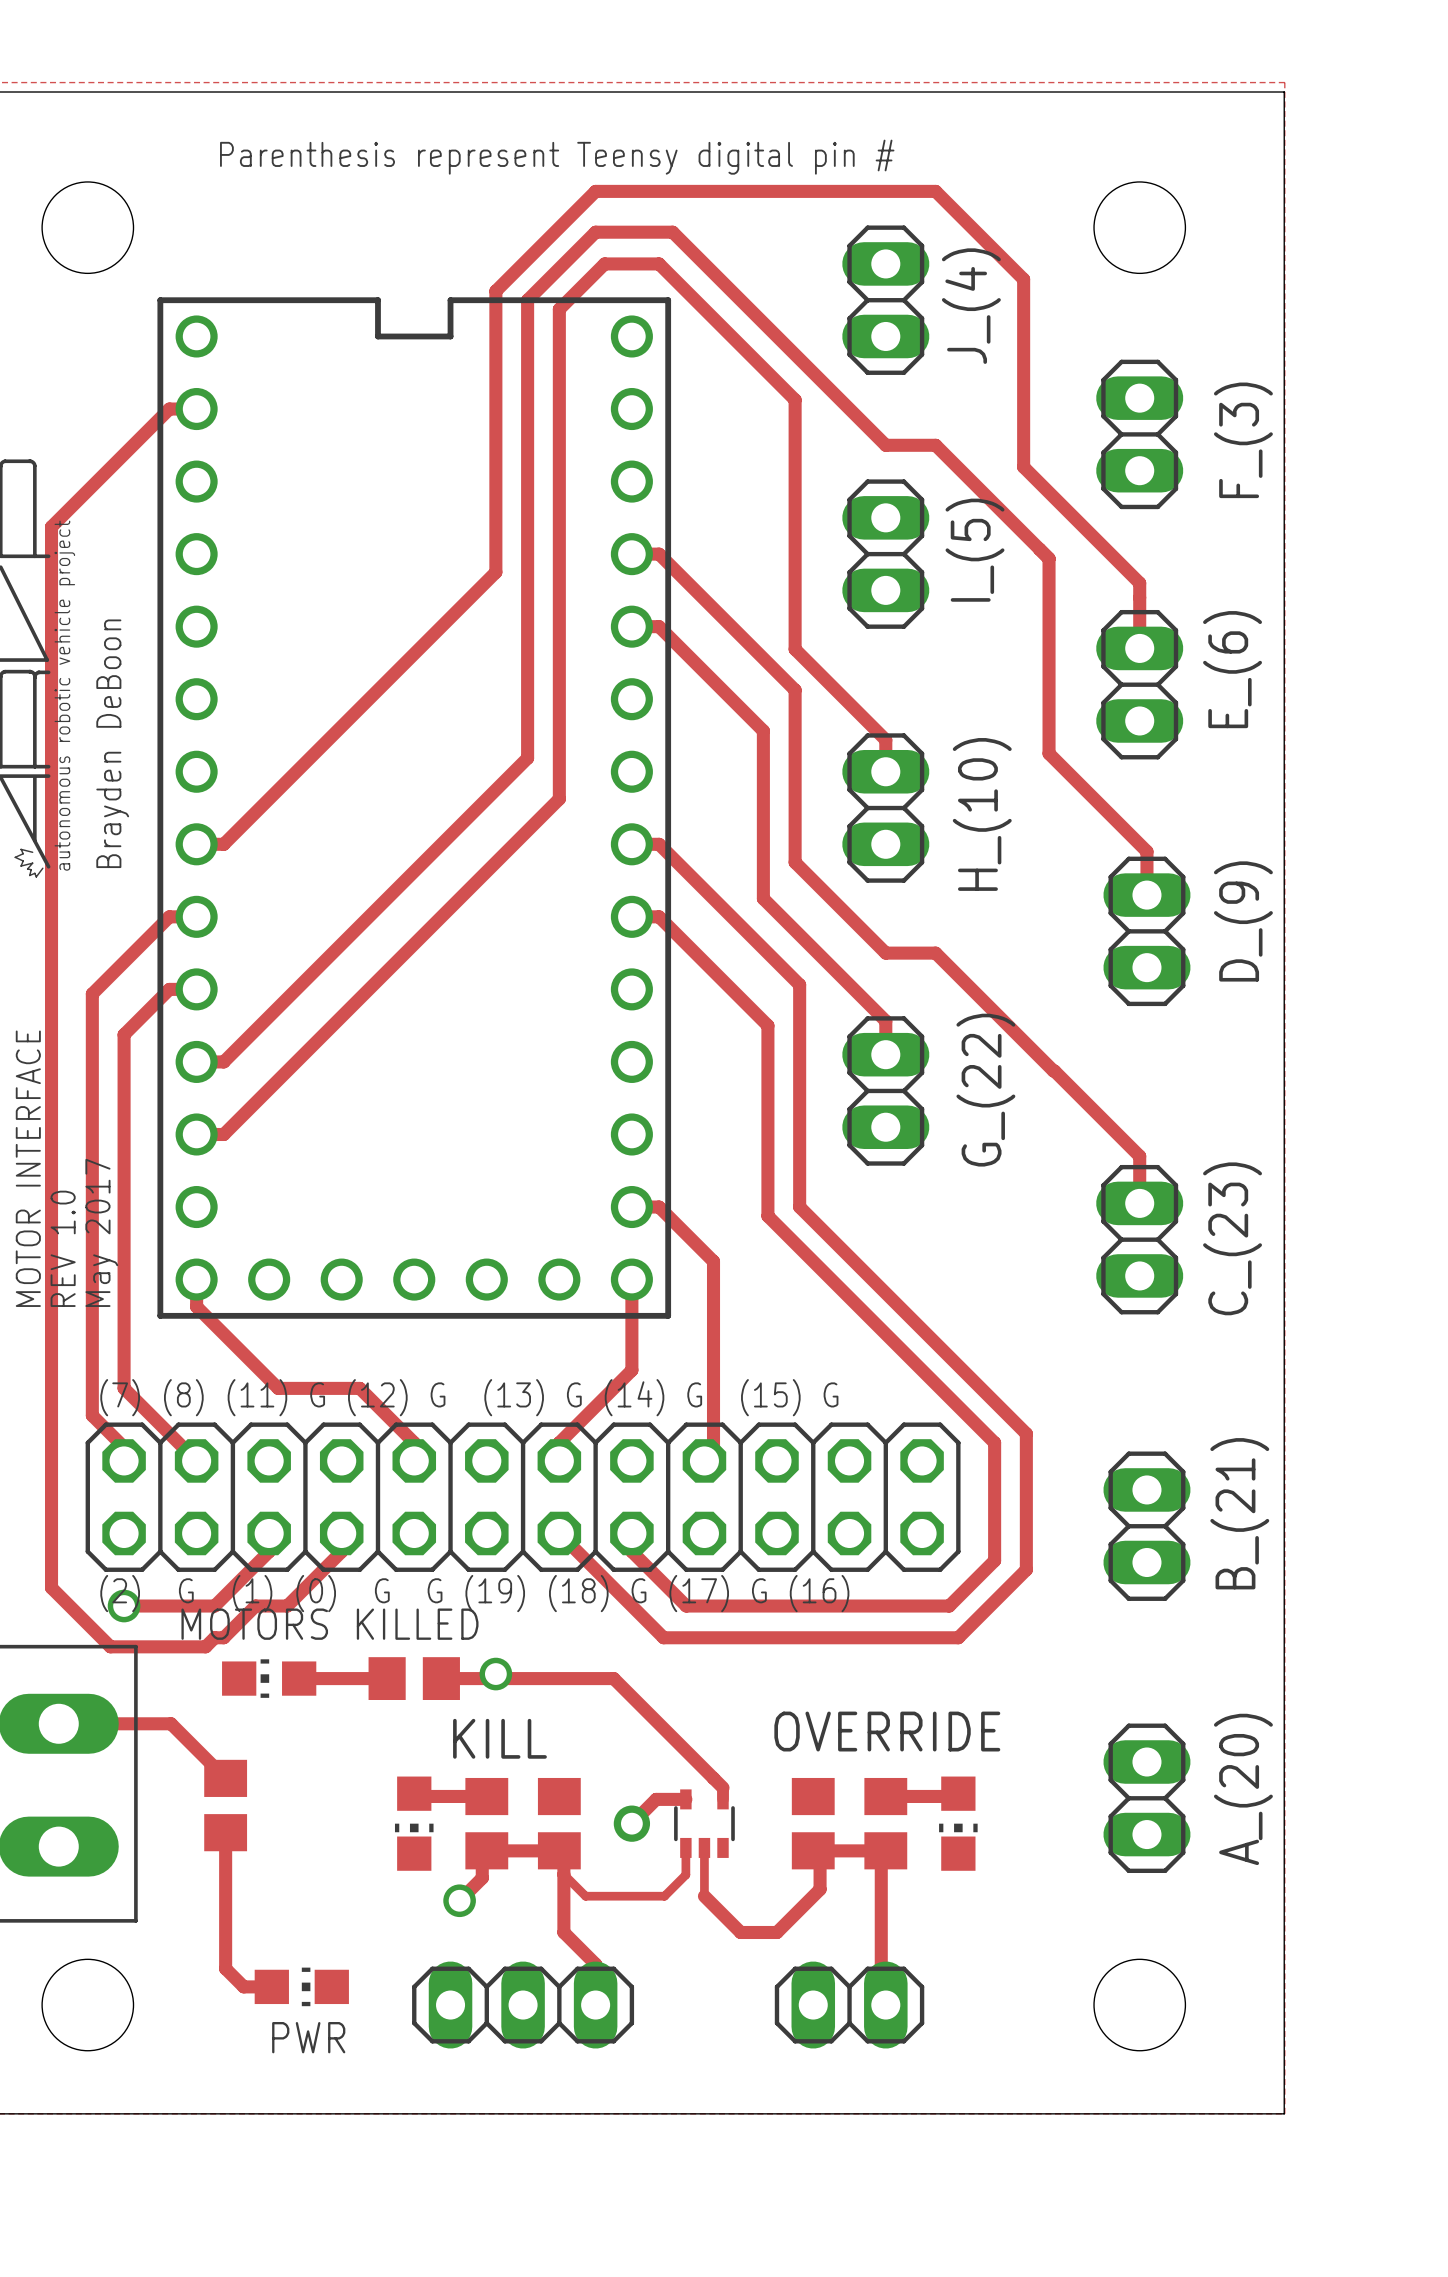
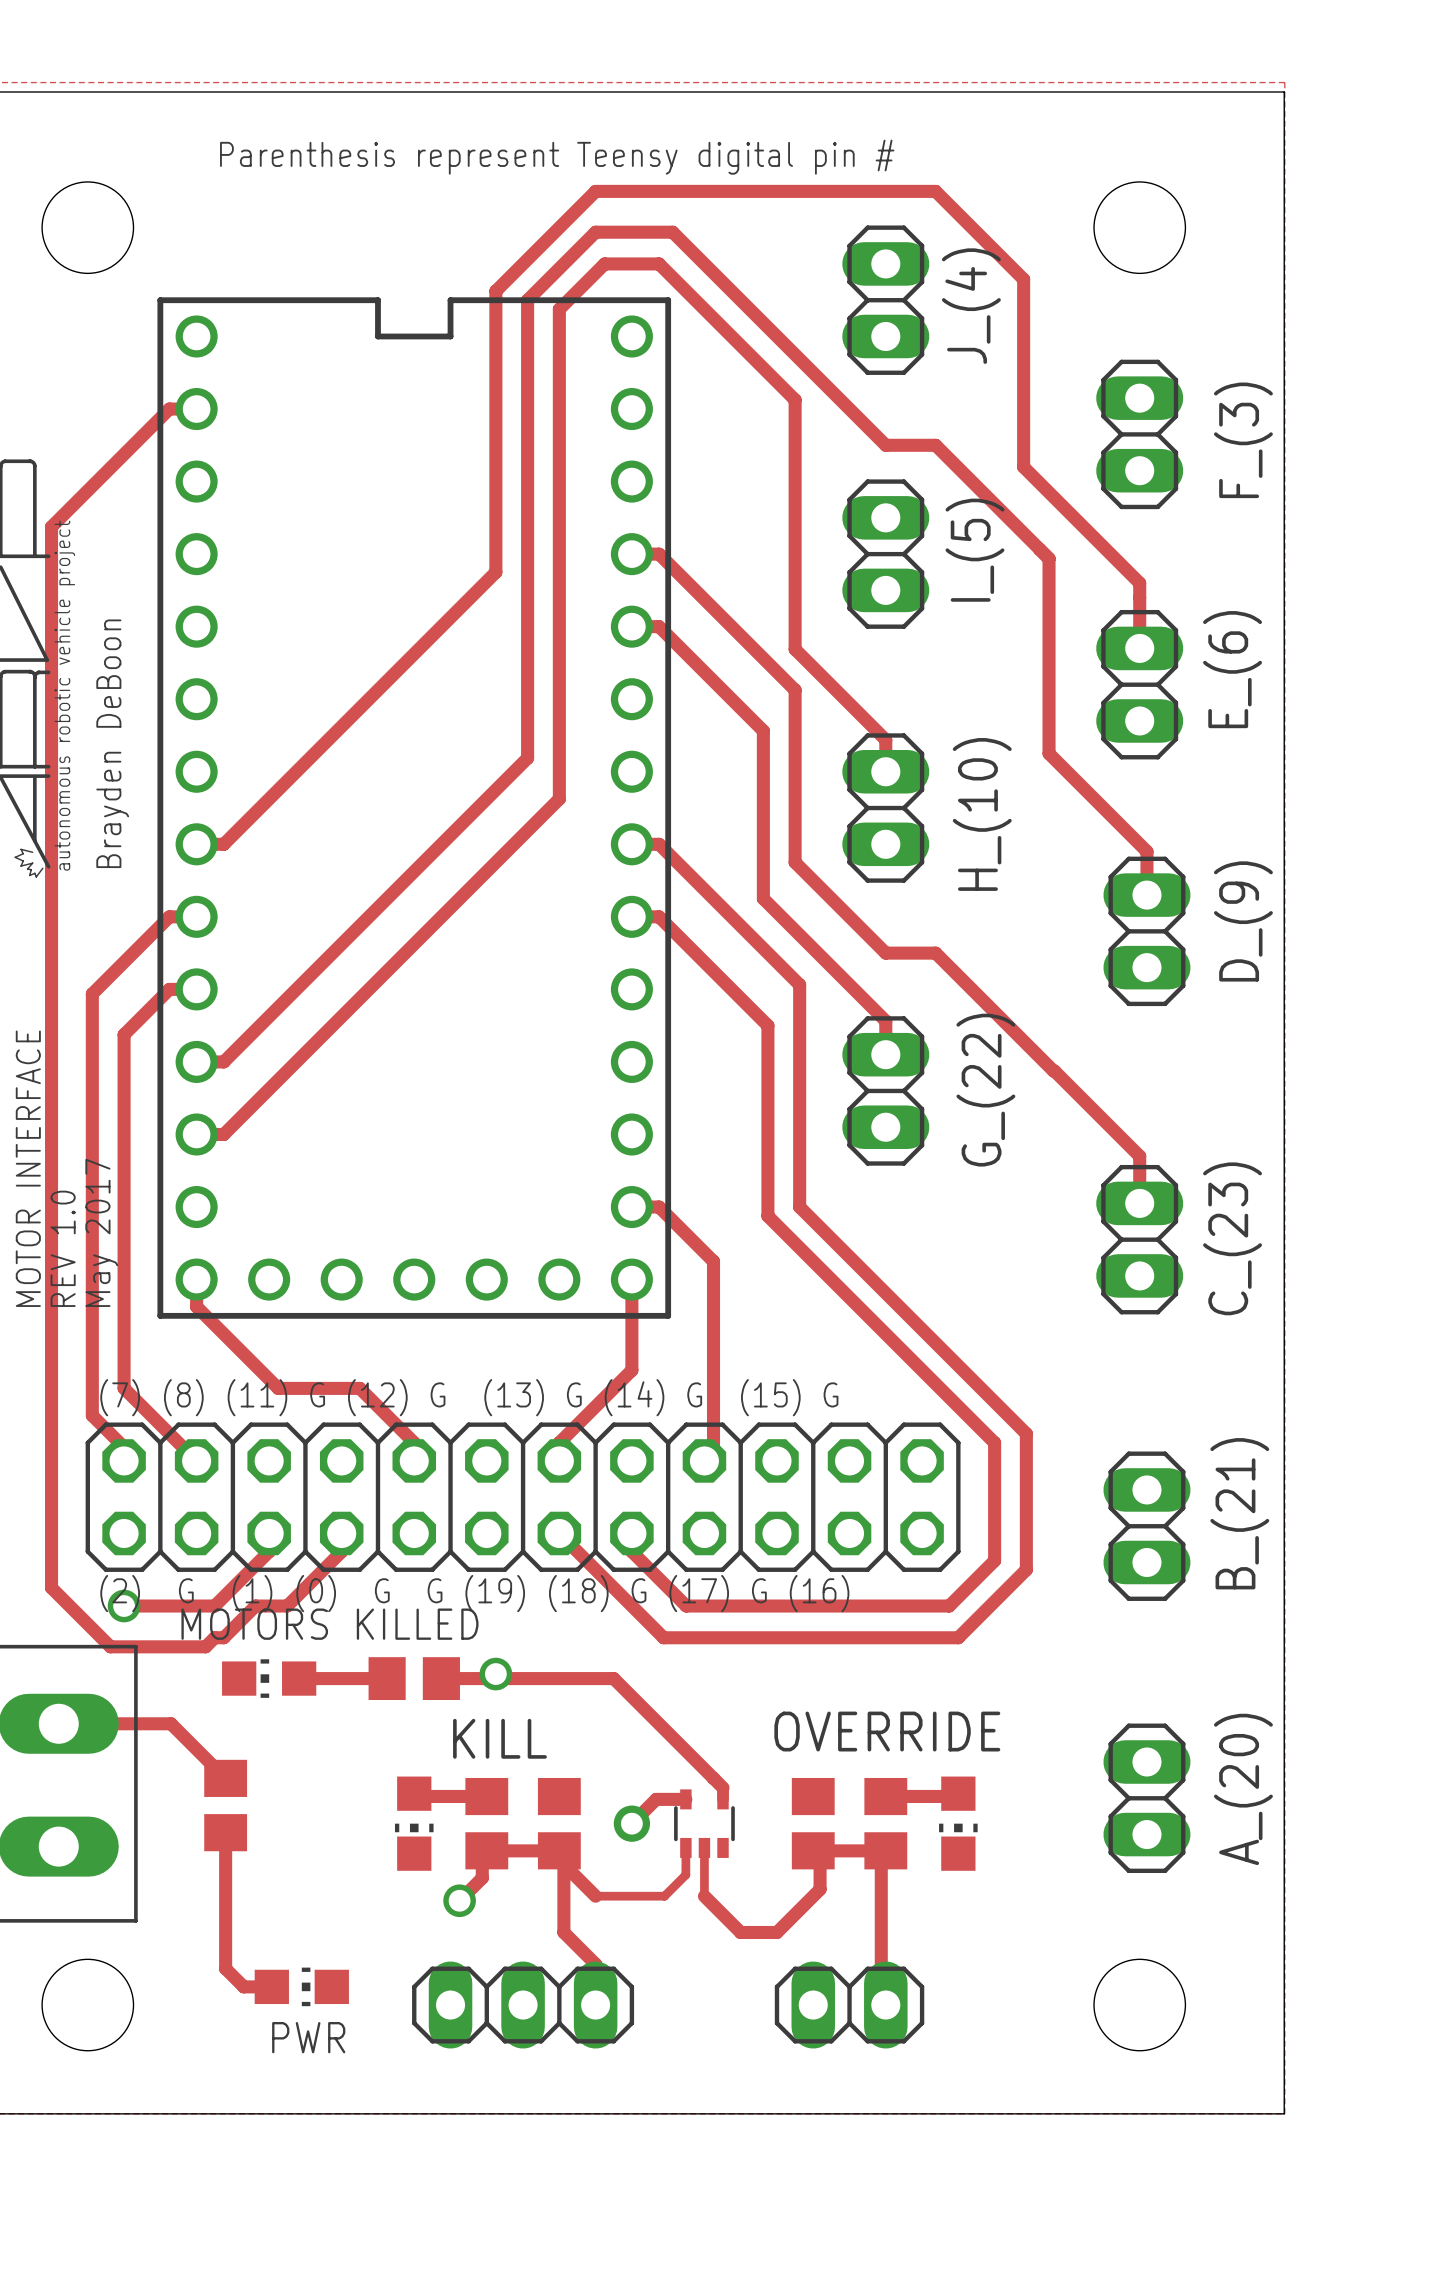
track: (563, 1874) (585, 1896) (595, 1896) -> (559, 1850) (559, 1859) (595, 1896)

